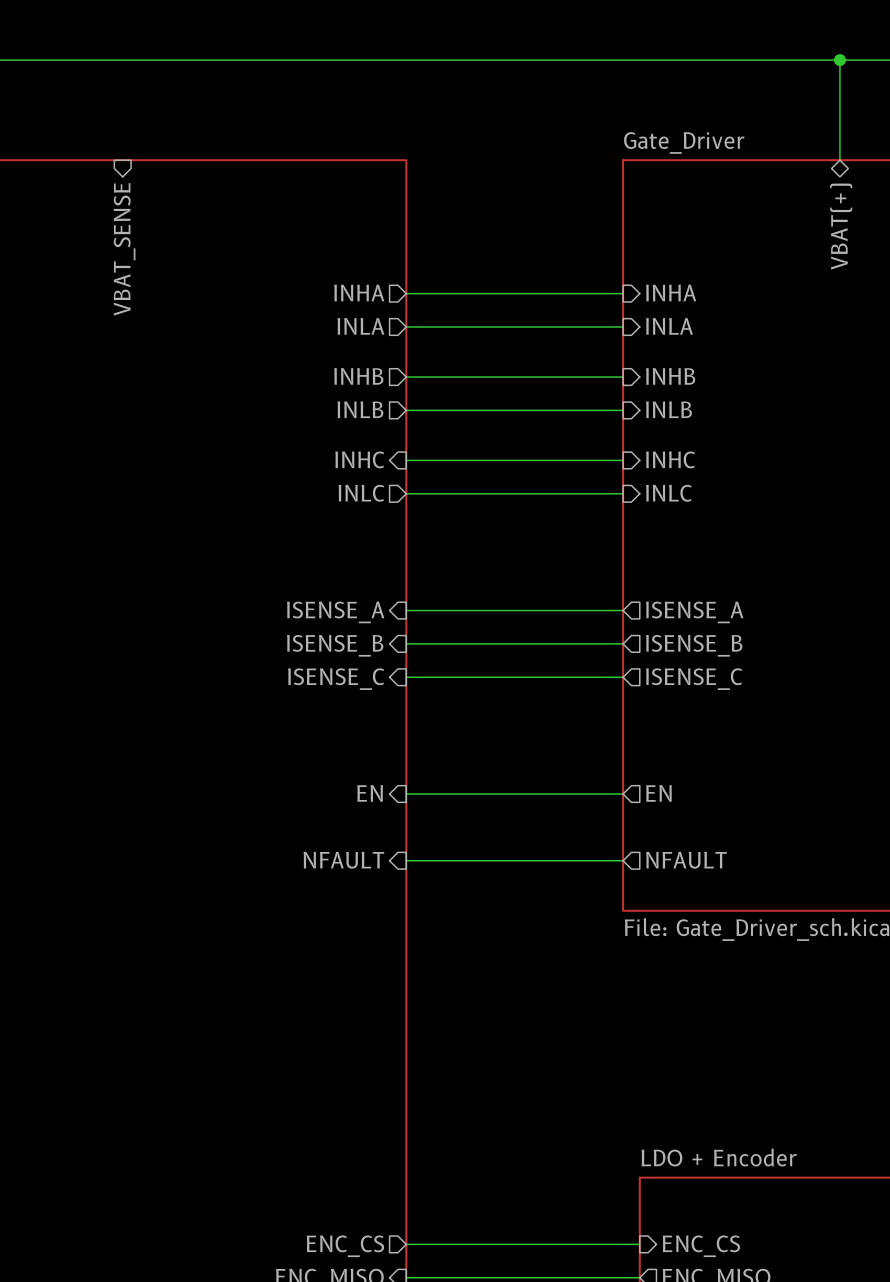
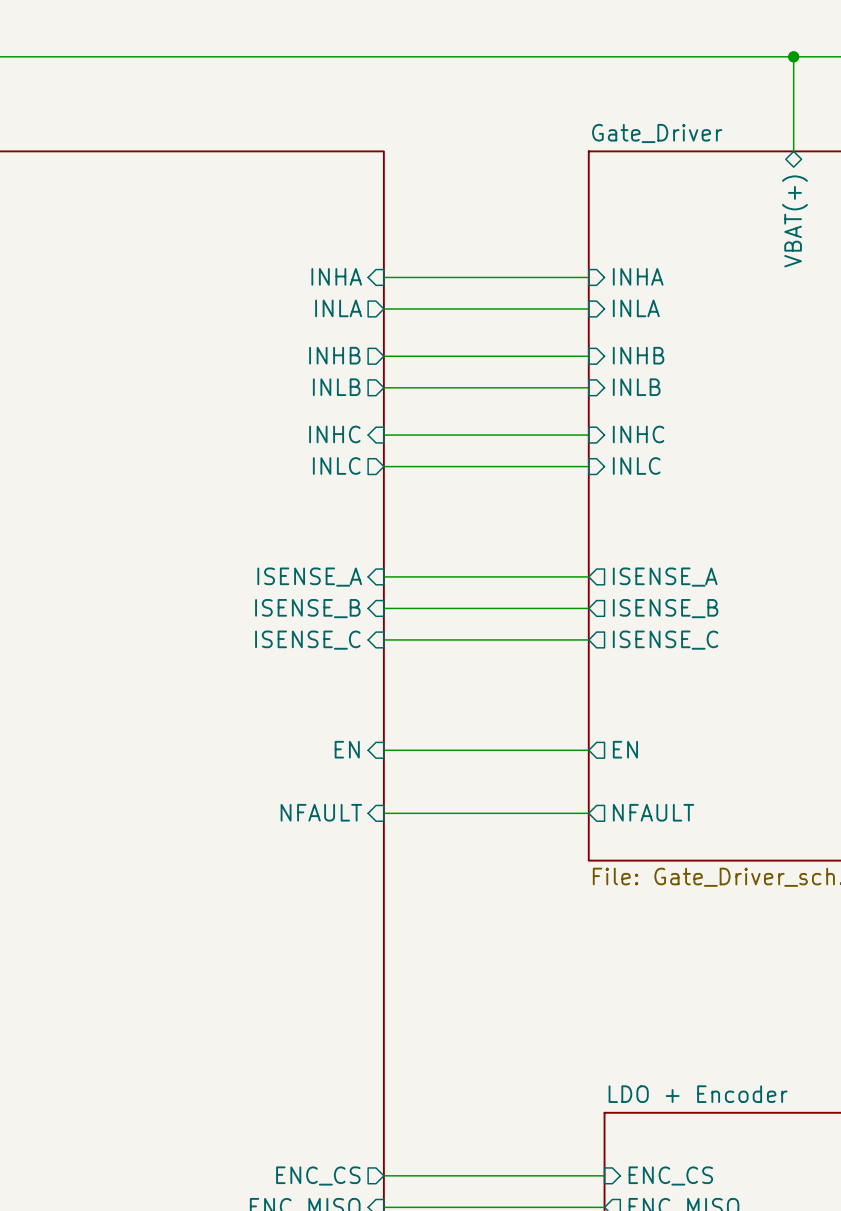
sheet pin: VBAT_SENSE (124, 249) -> none
sheet pin shape: output (359, 293) -> input (336, 276)

